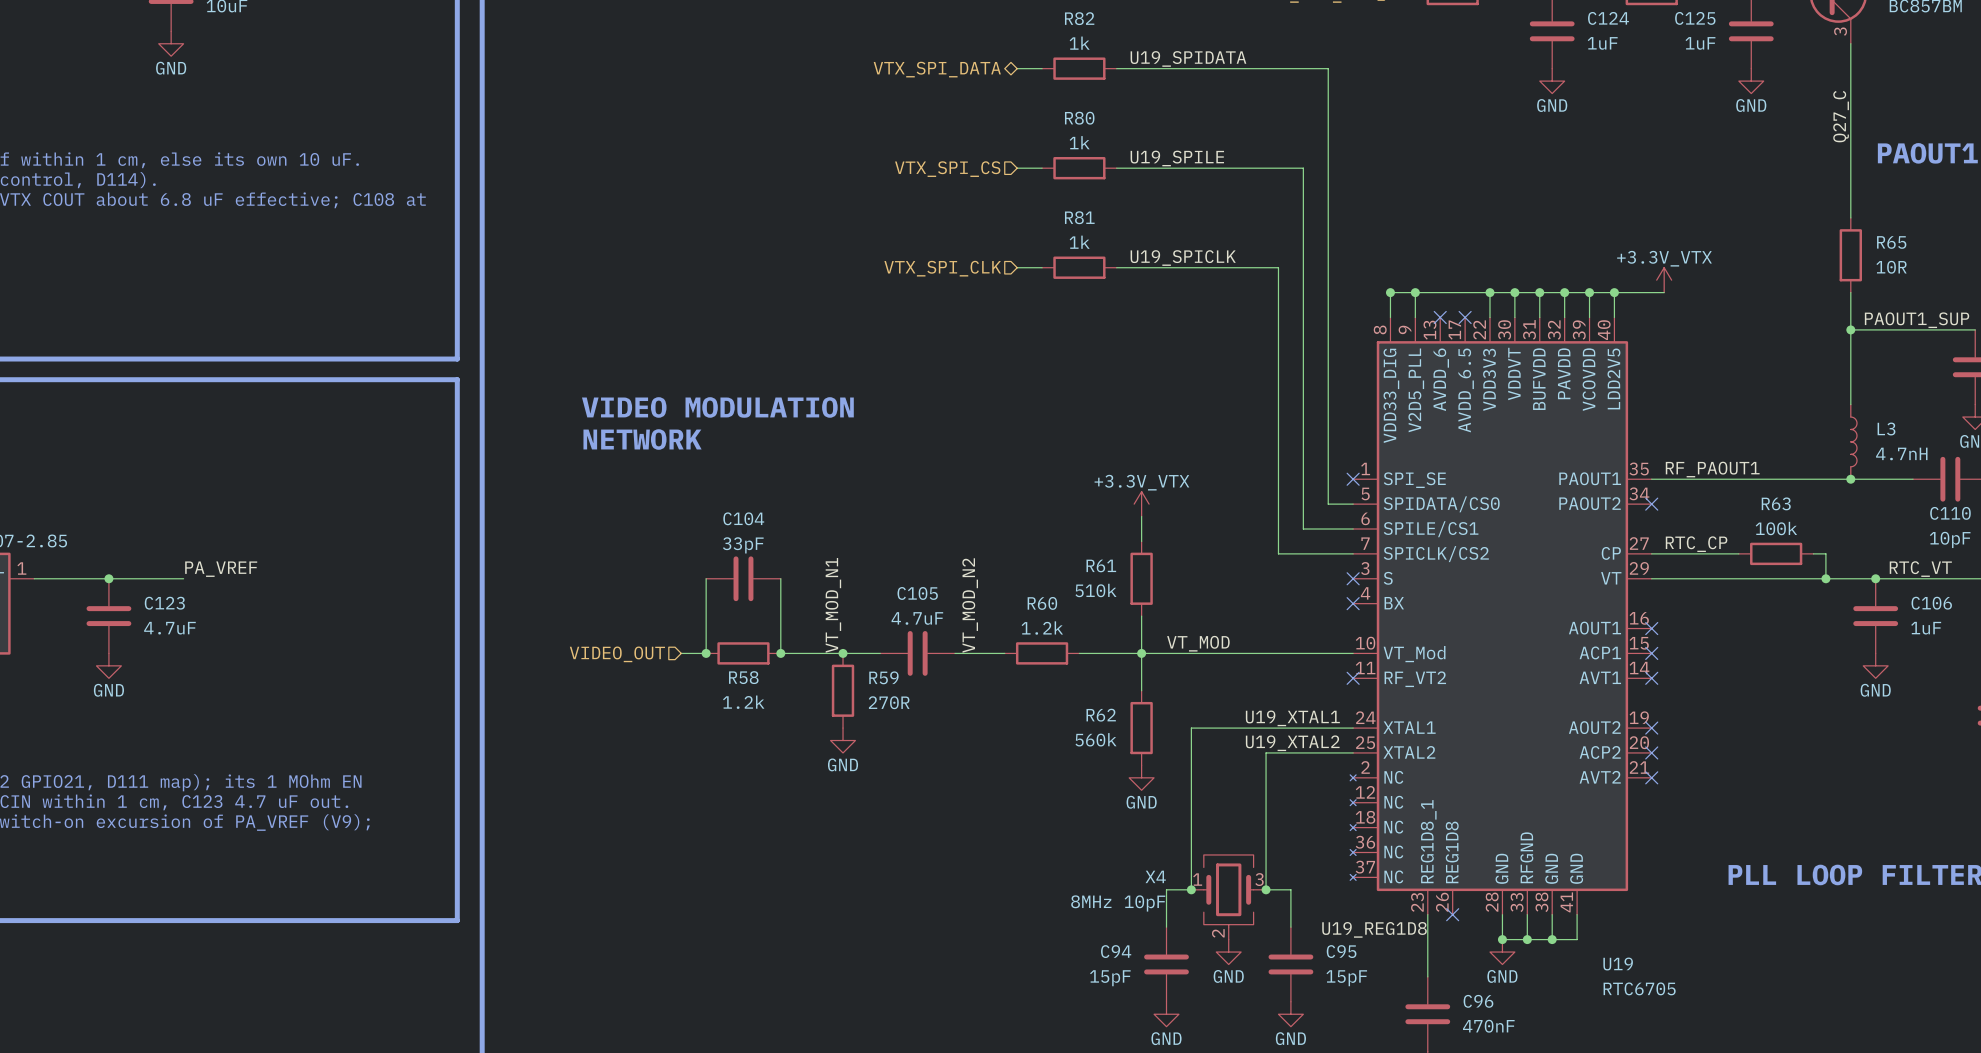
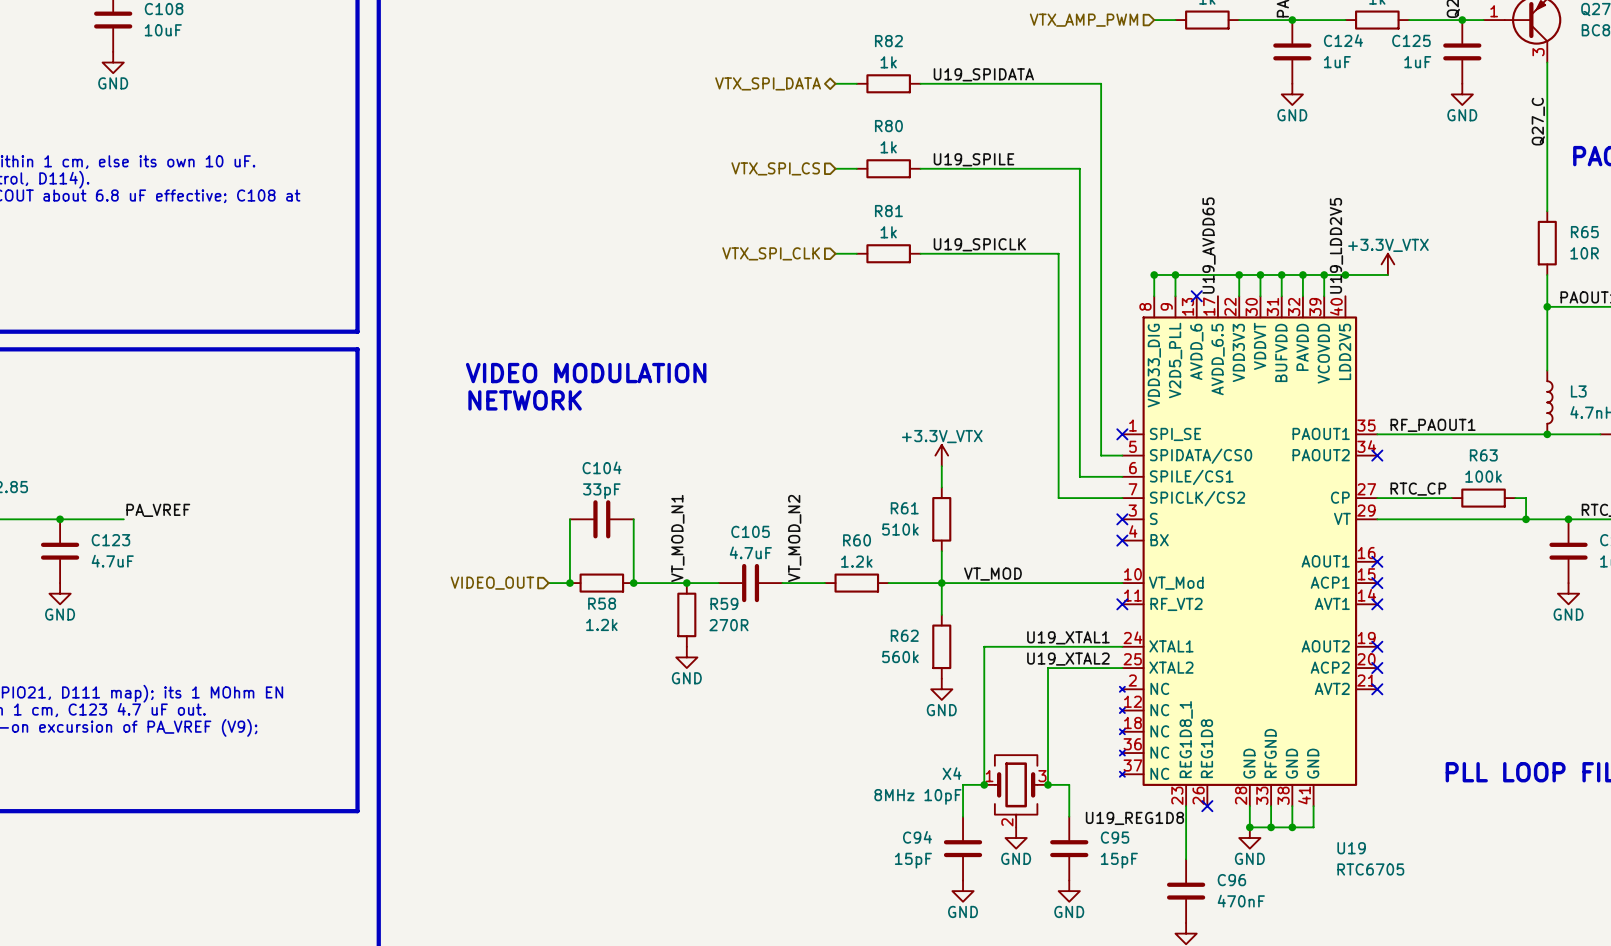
label: none -> U19_AVDD65 (1209, 245)
label: none -> U19_LDD2V5 (1336, 245)
wire: (1614, 292) (1614, 317) -> none
no-connect mark: (1465, 317) -> none

